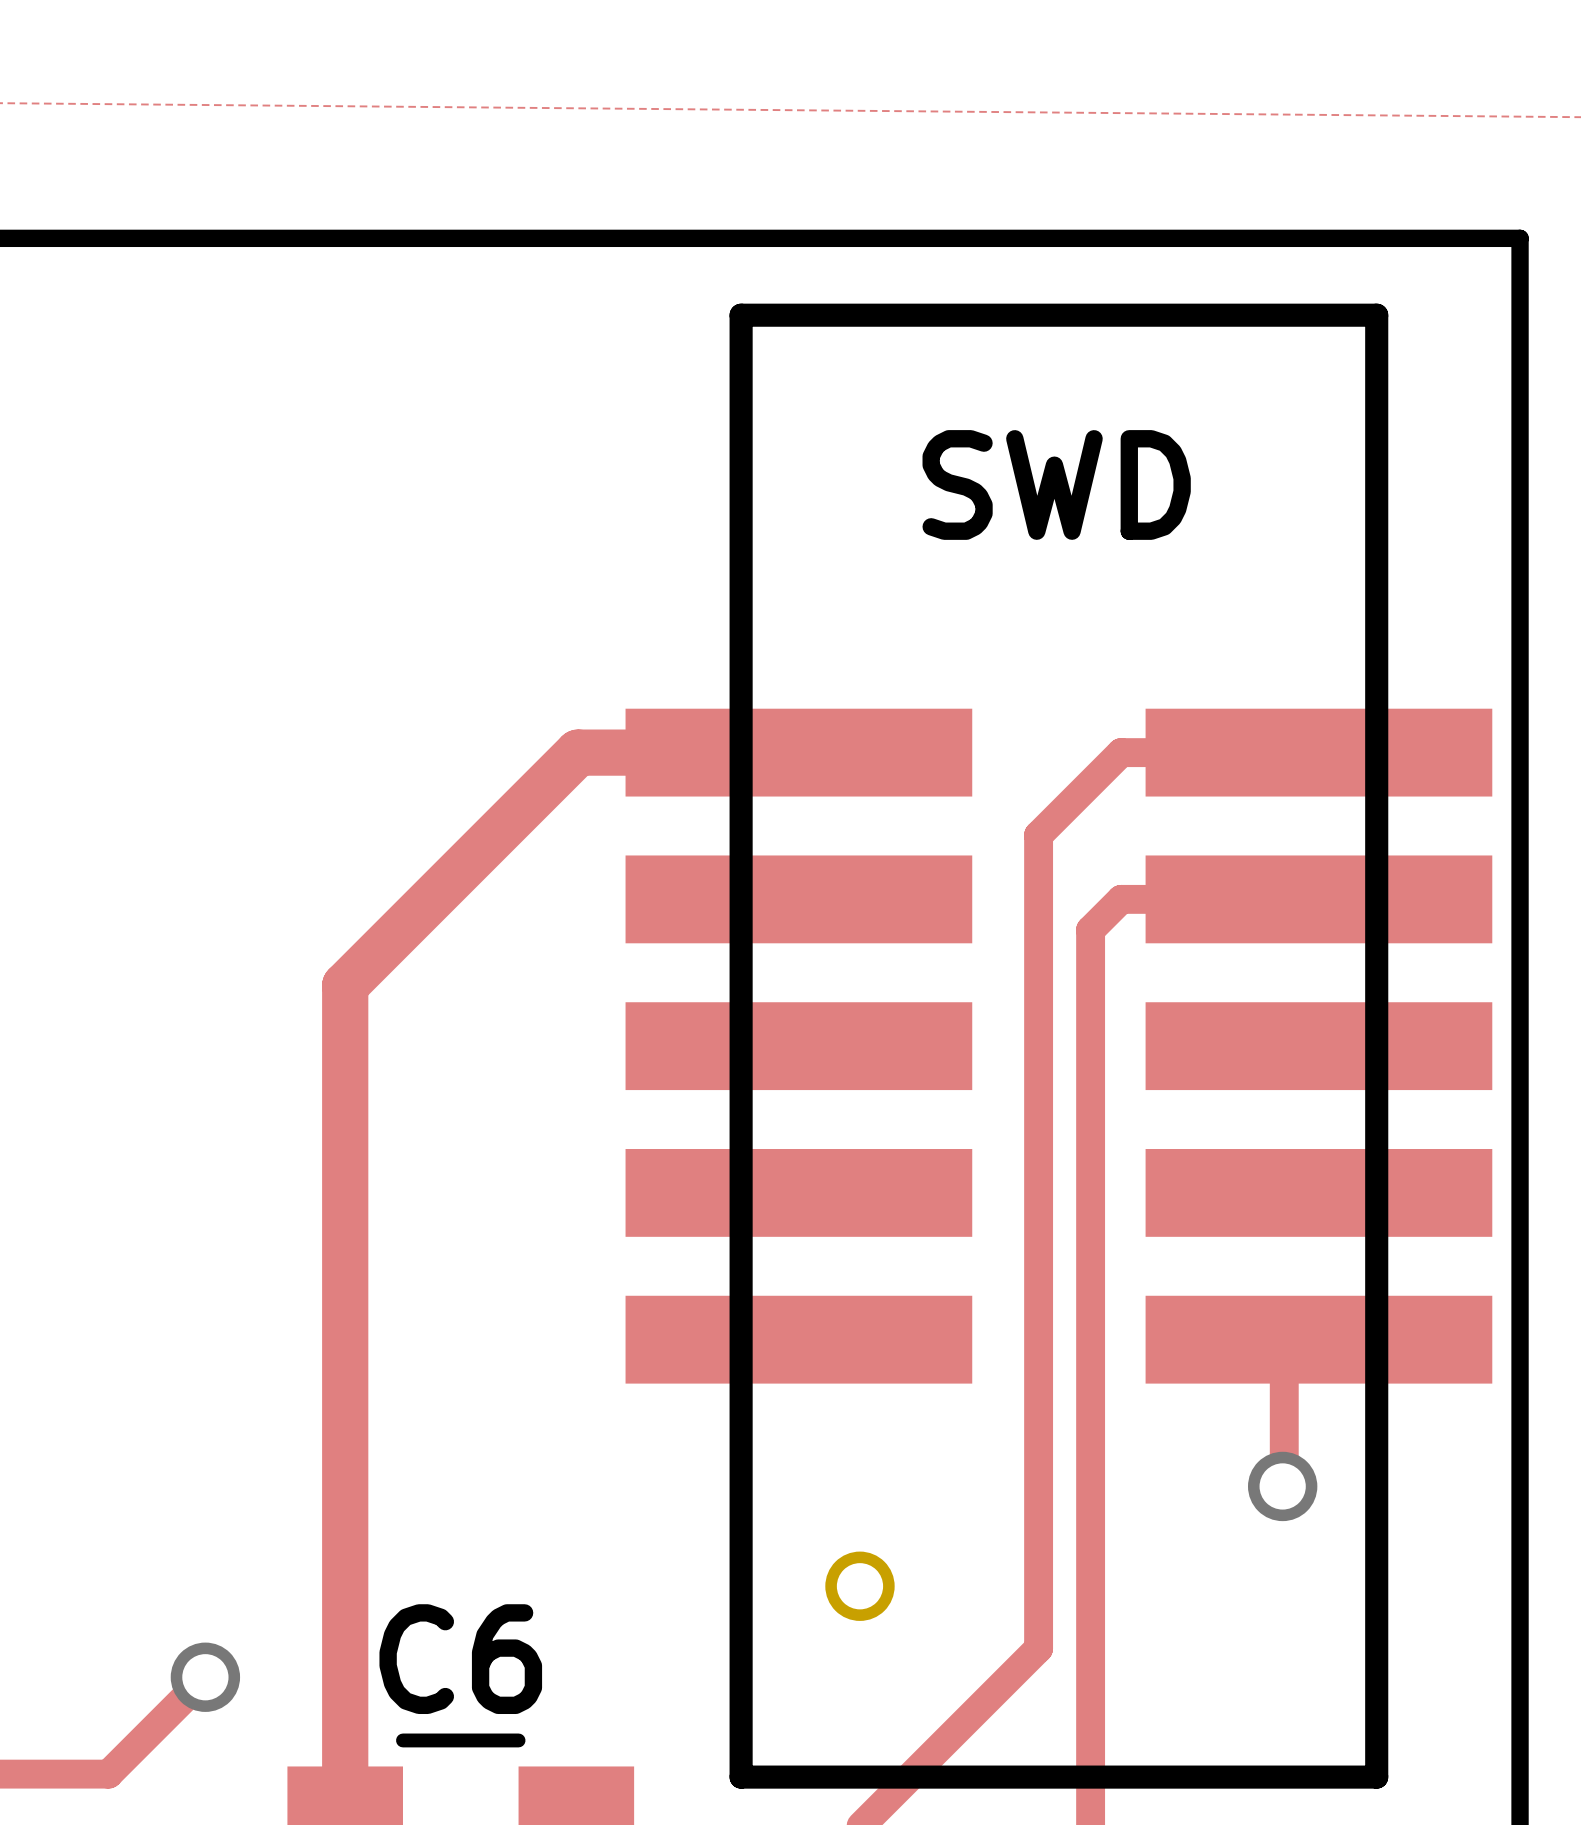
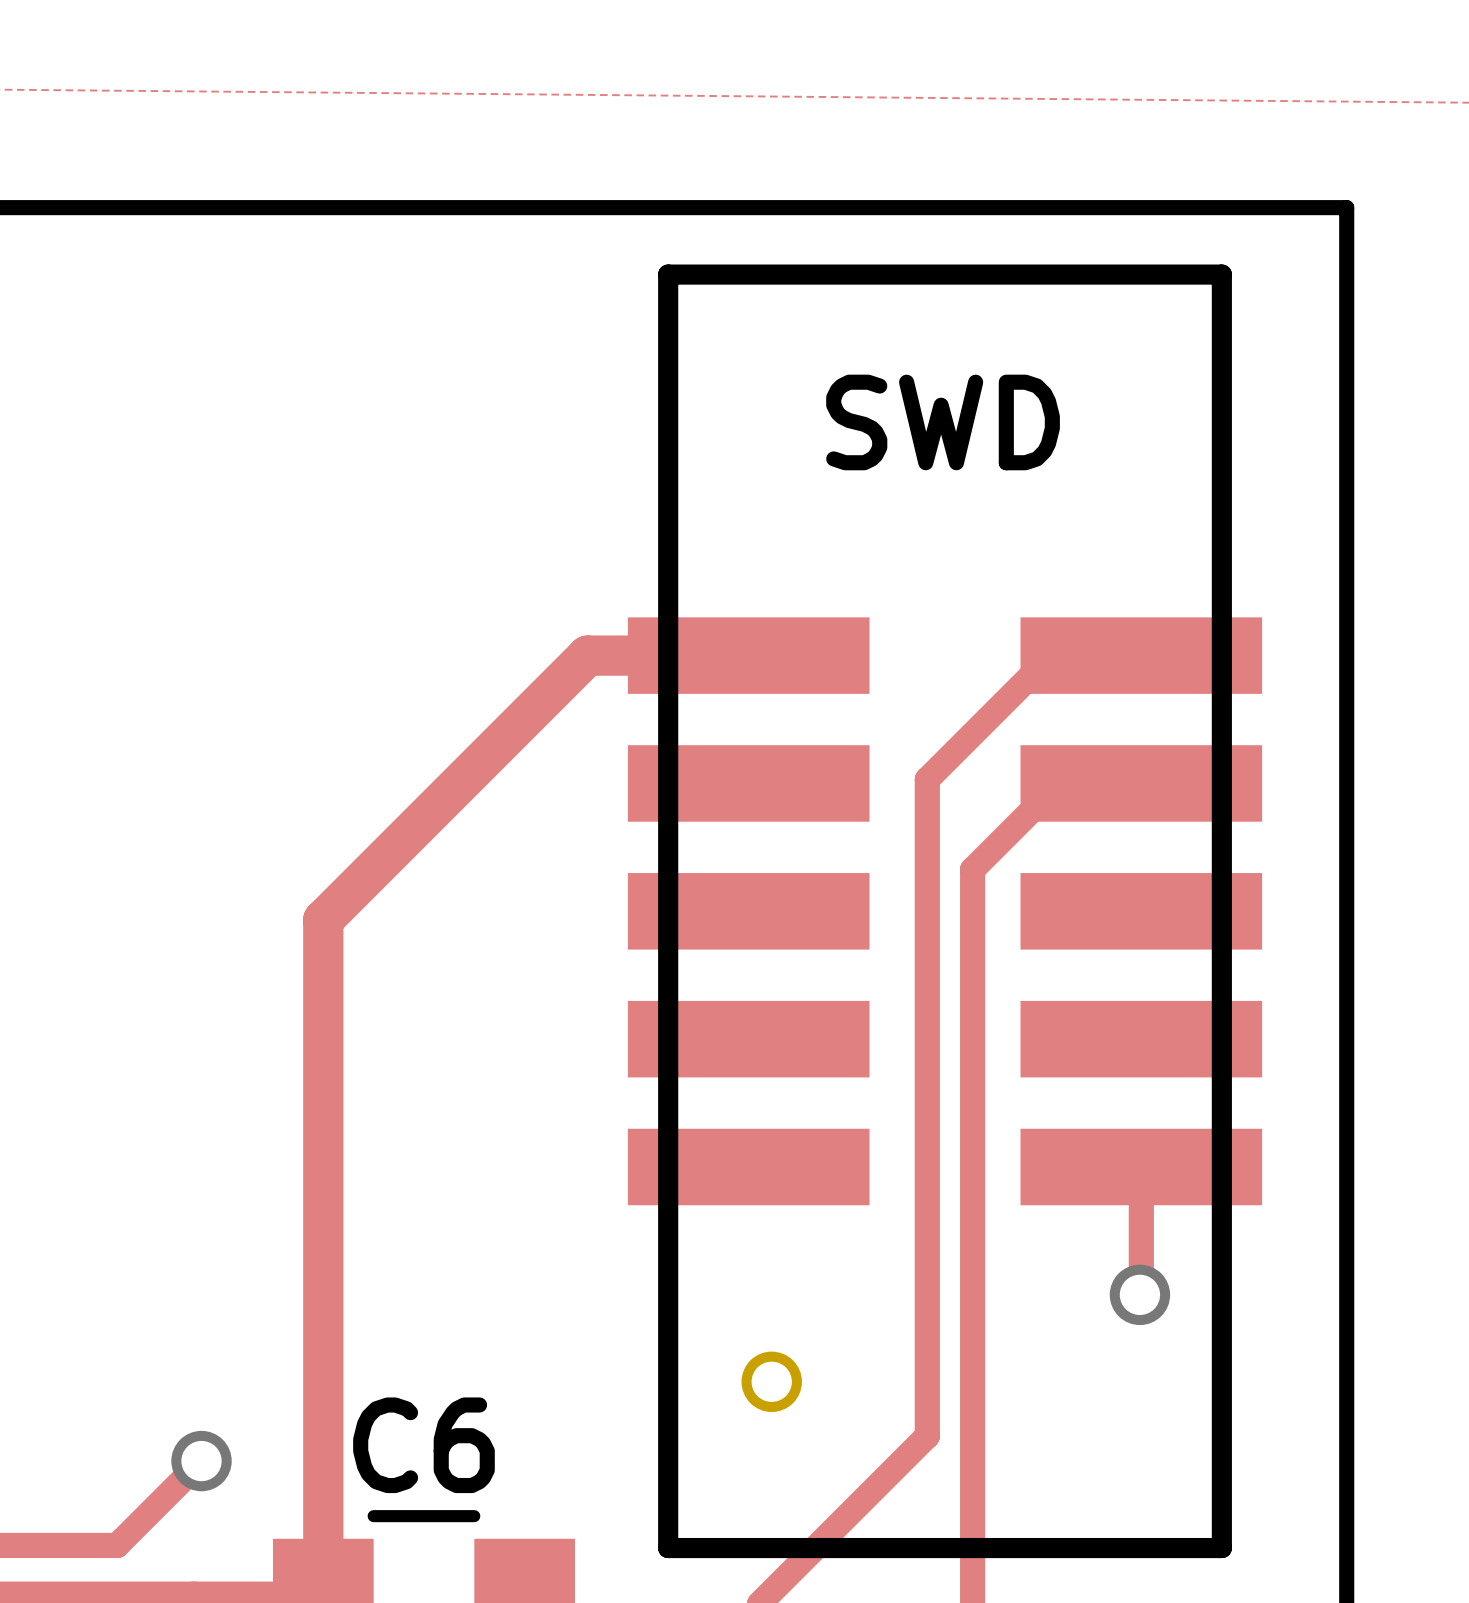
part footprint: [625, 303, 1493, 1789] -> [627, 264, 1263, 1559]
track: (648, 752) (578, 752) (345, 985) (345, 1056) -> (587, 655) (323, 919)
track: (1180, 752) (1121, 752) (1038, 835) (1038, 894) -> (1051, 655) (927, 779)
track: (1189, 899) (1121, 899) (1090, 930) (1090, 998) -> (1058, 783) (972, 869)

